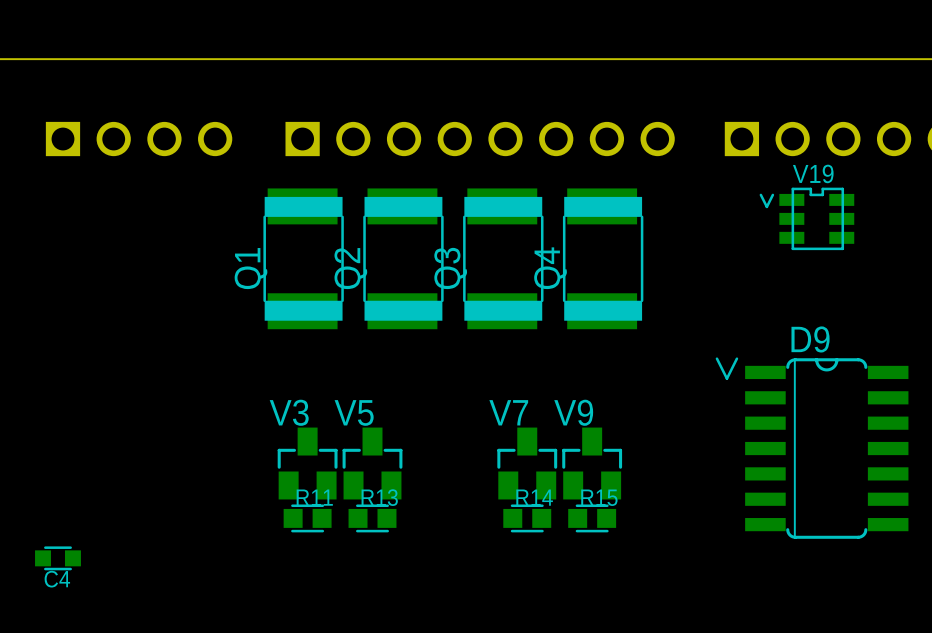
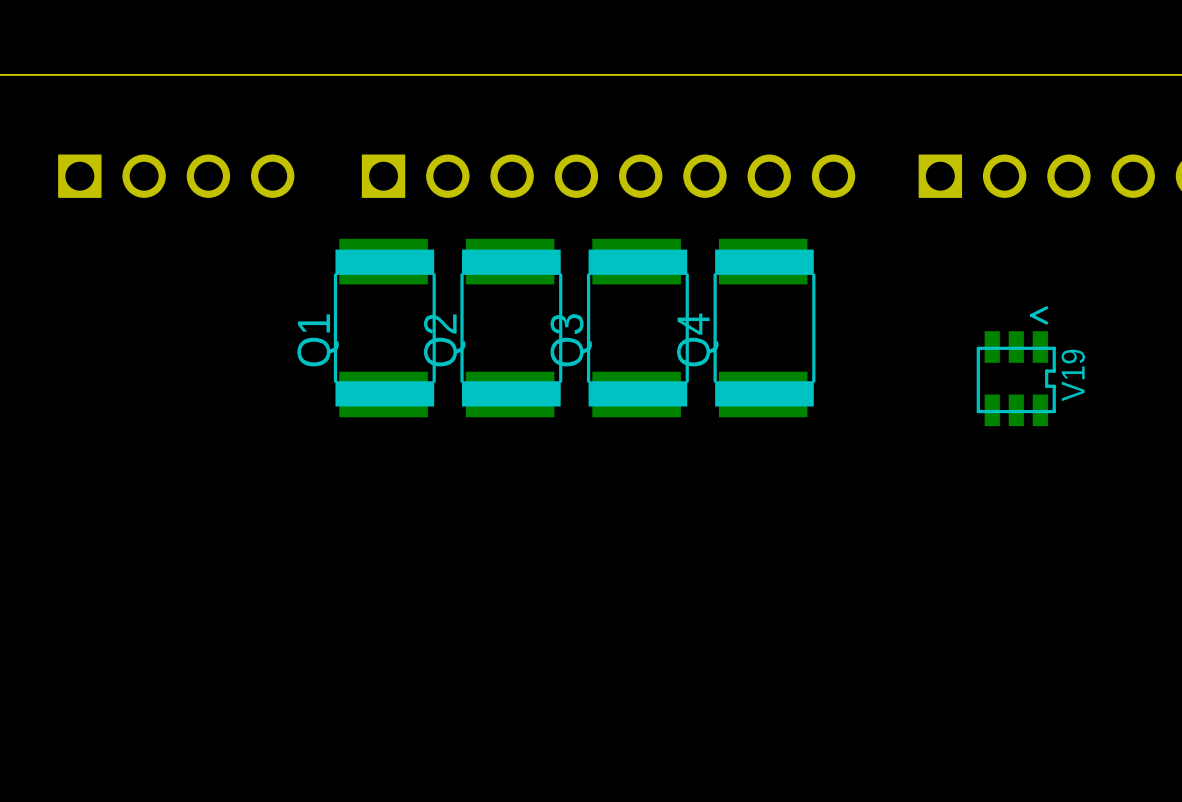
V19 rotation: 0° (806, 218) -> 90° clockwise (1016, 366)
V19 position: (806, 218) -> (1016, 366)
D9: (812, 448) -> none
V3: (307, 463) -> none
V5: (372, 463) -> none
V7: (527, 463) -> none
V9: (592, 463) -> none
R11: (307, 518) -> none
R13: (372, 518) -> none
R14: (527, 518) -> none
R15: (592, 518) -> none
C4: (58, 558) -> none

